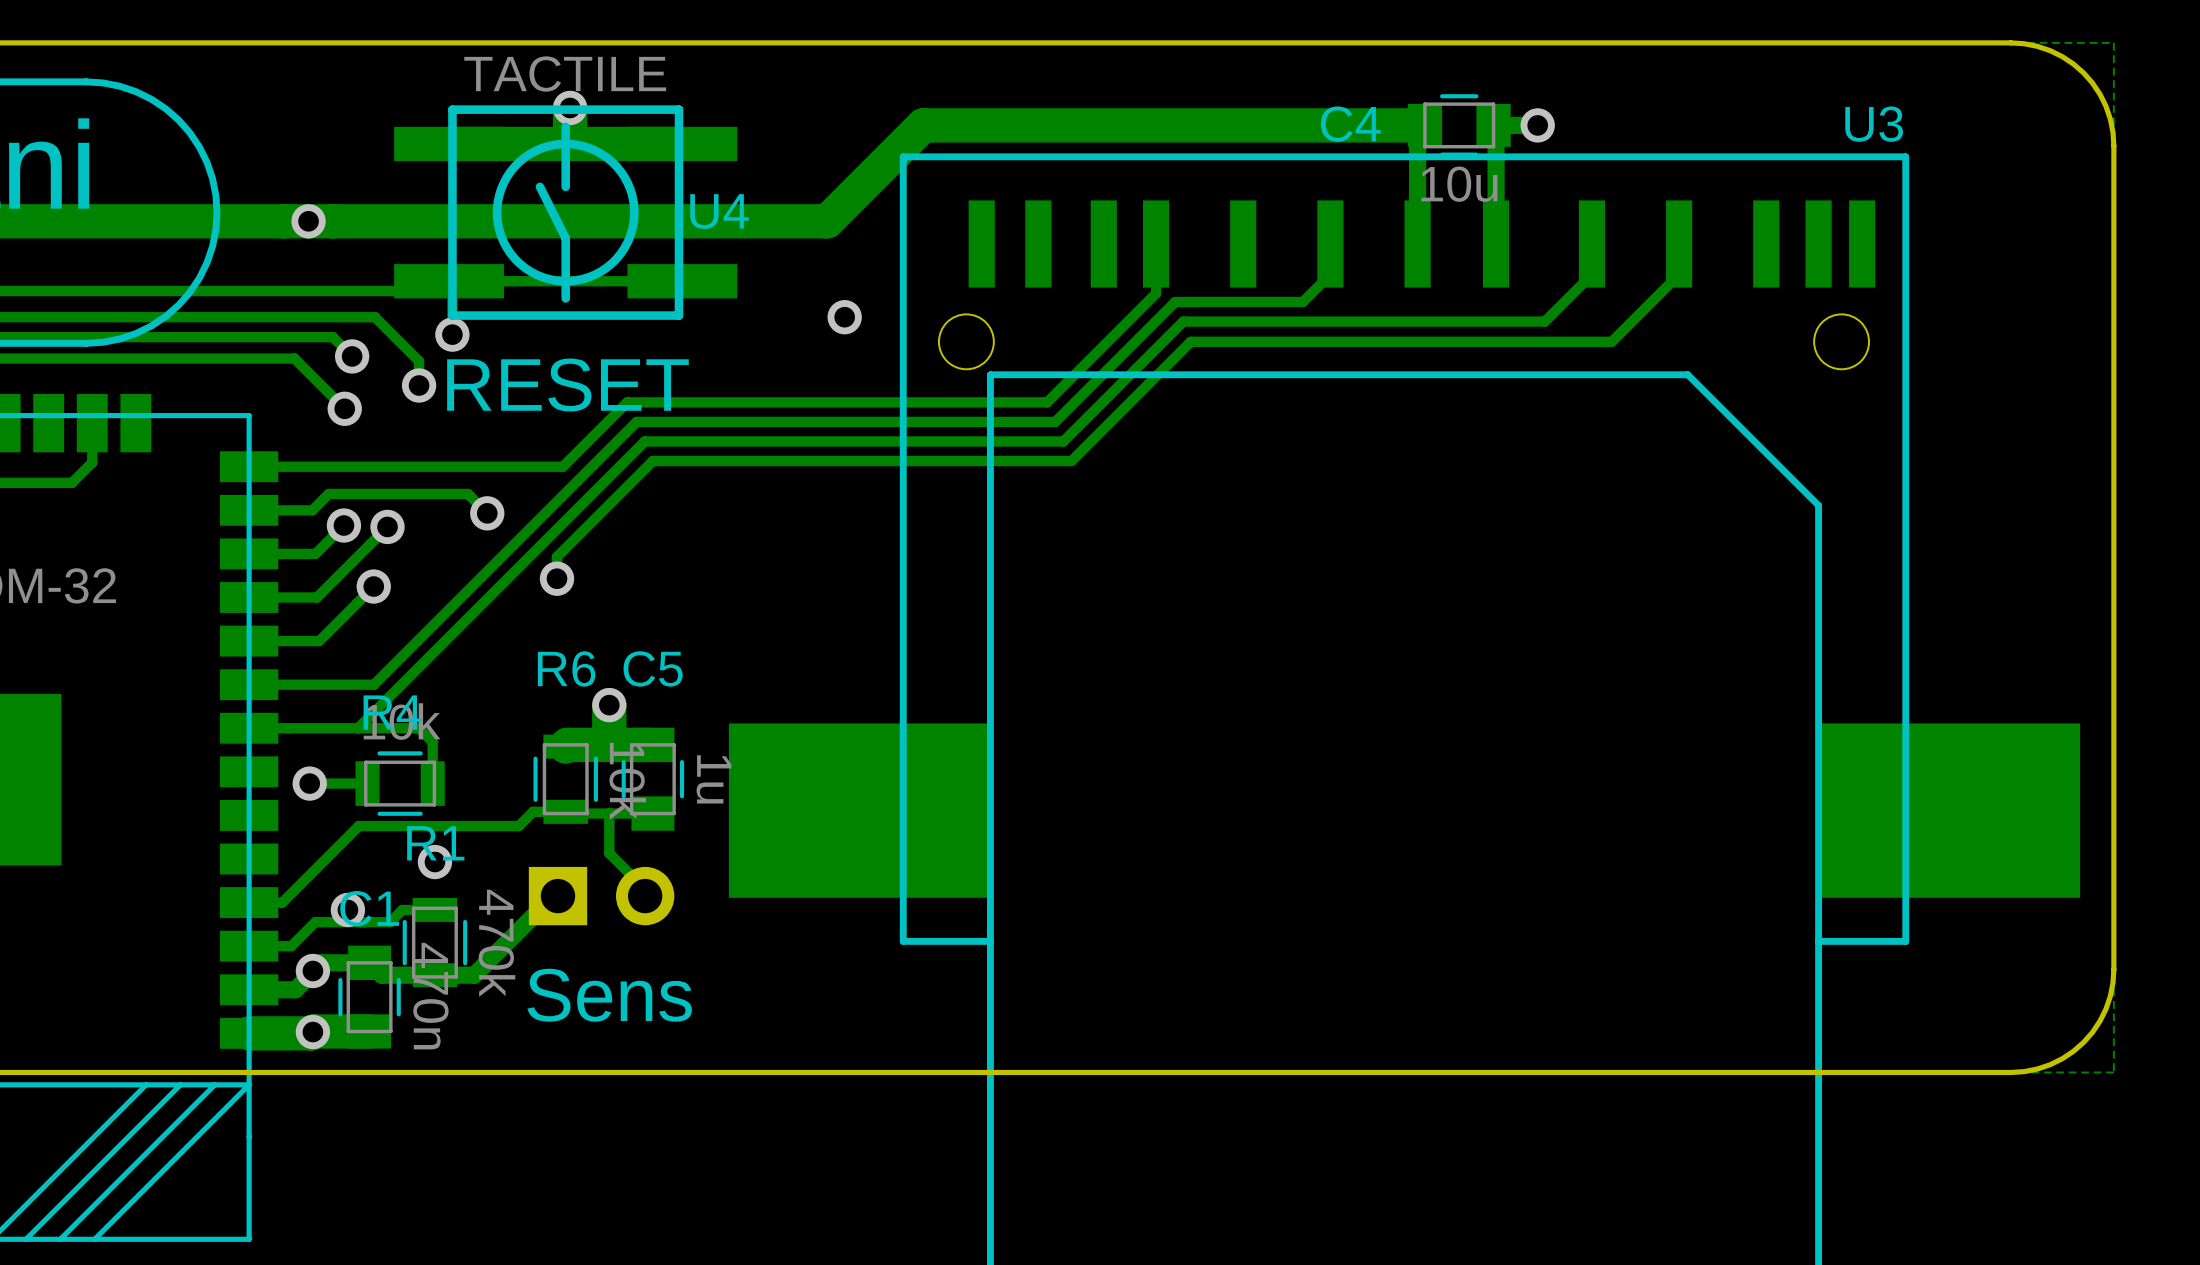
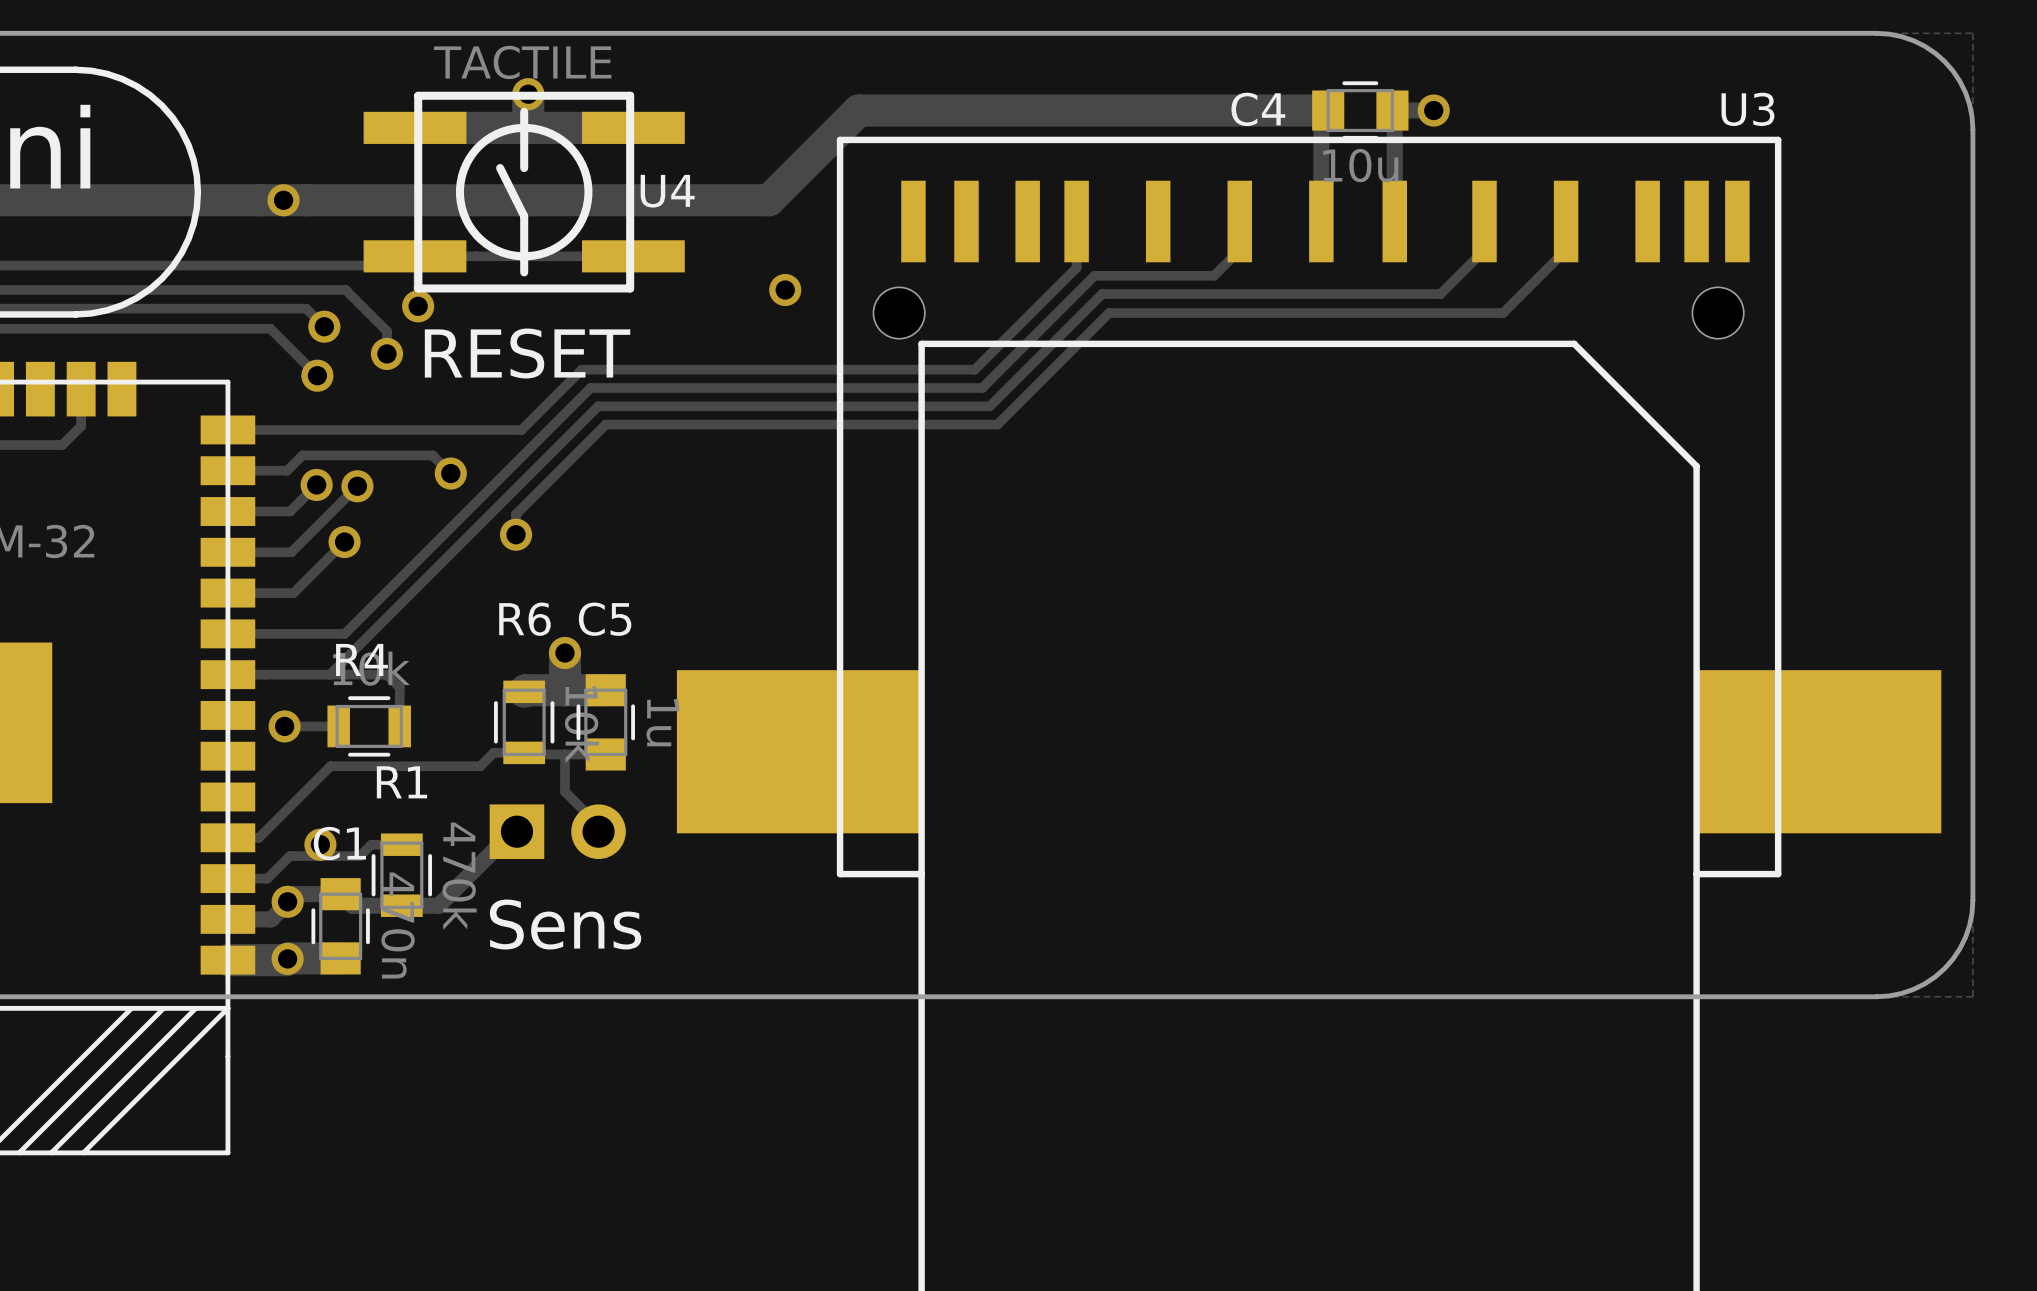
via: (434, 862) -> none

